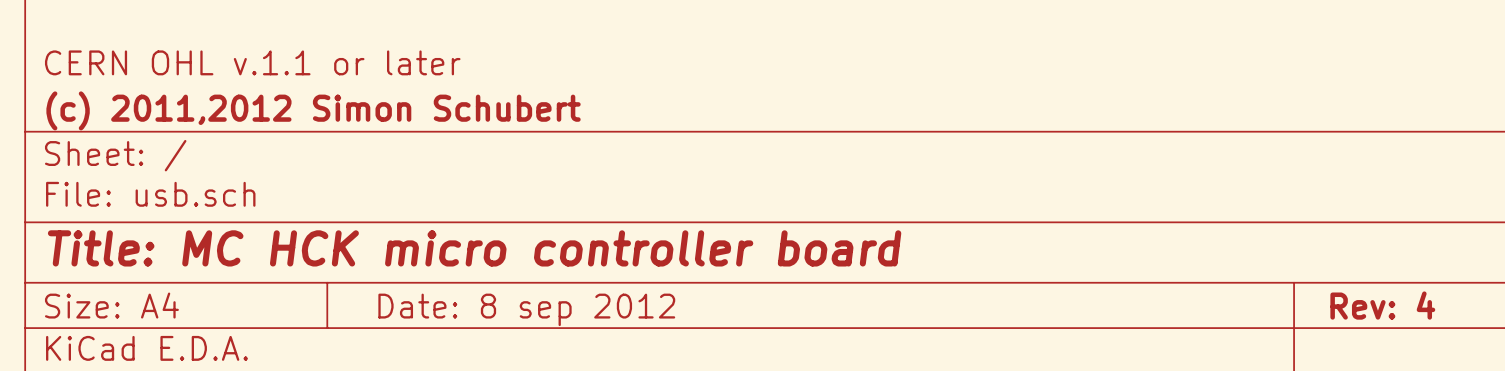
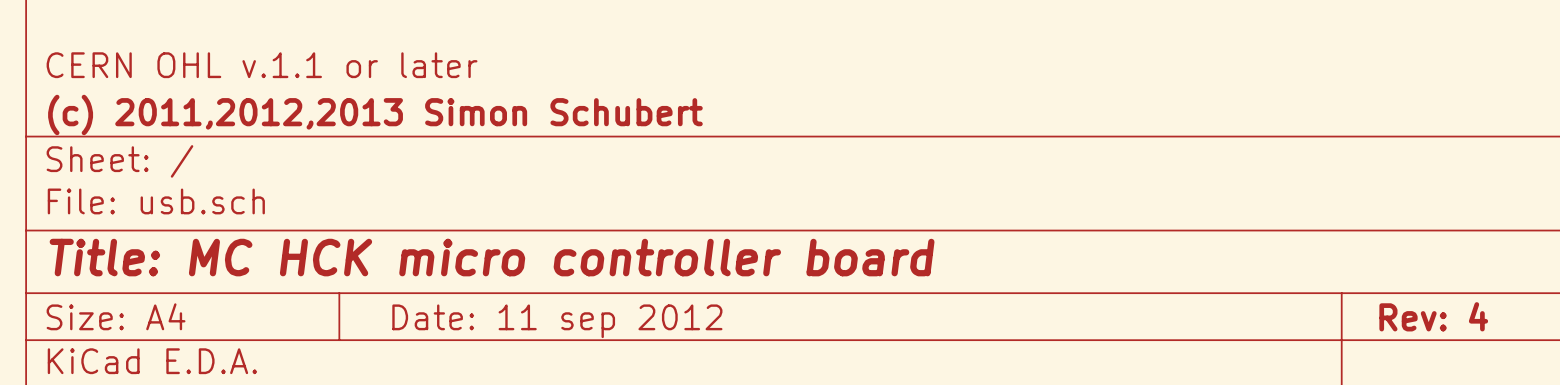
title block: (c) 2011,2012 Simon Schubert (313, 110) -> (c) 2011,2012,2013 Simon Schubert (375, 114)
title block: Date: 8 sep 2012 (526, 309) -> Date: 11 sep 2012 (557, 321)

